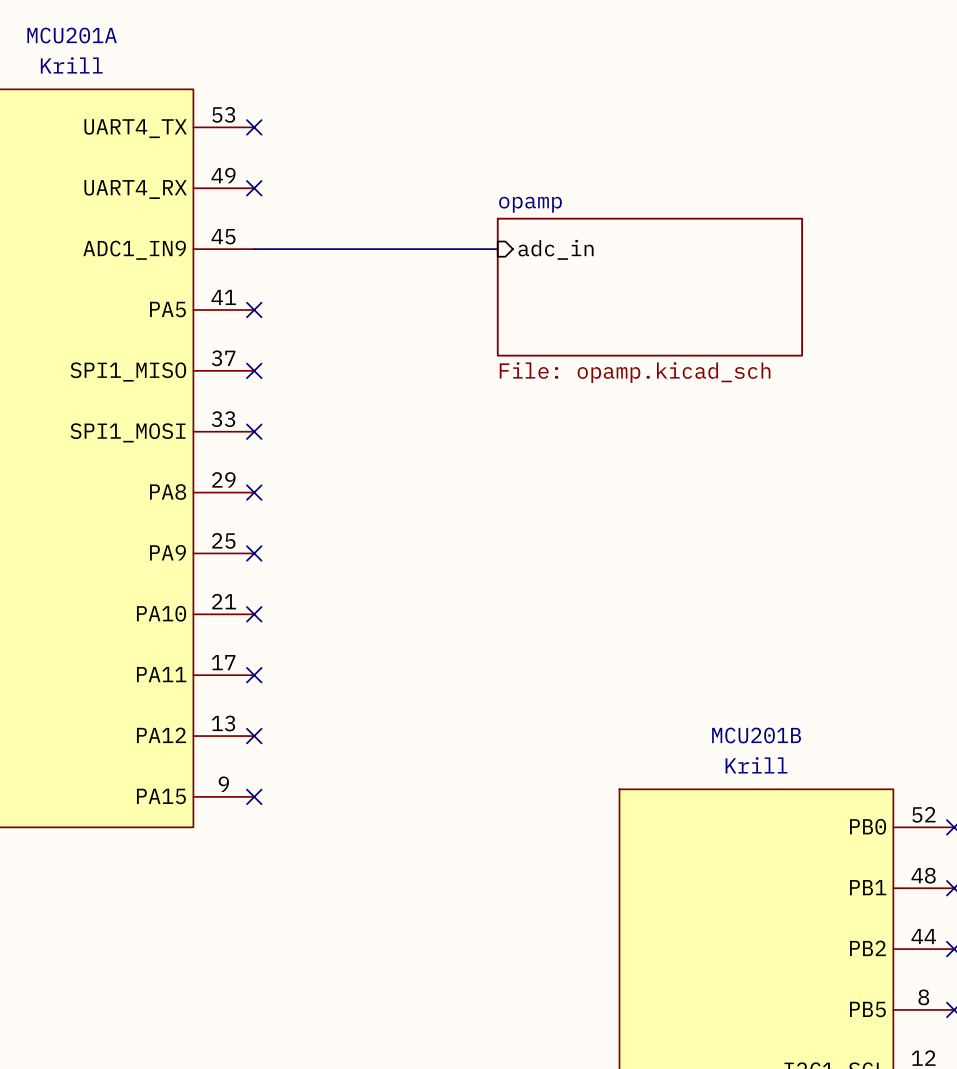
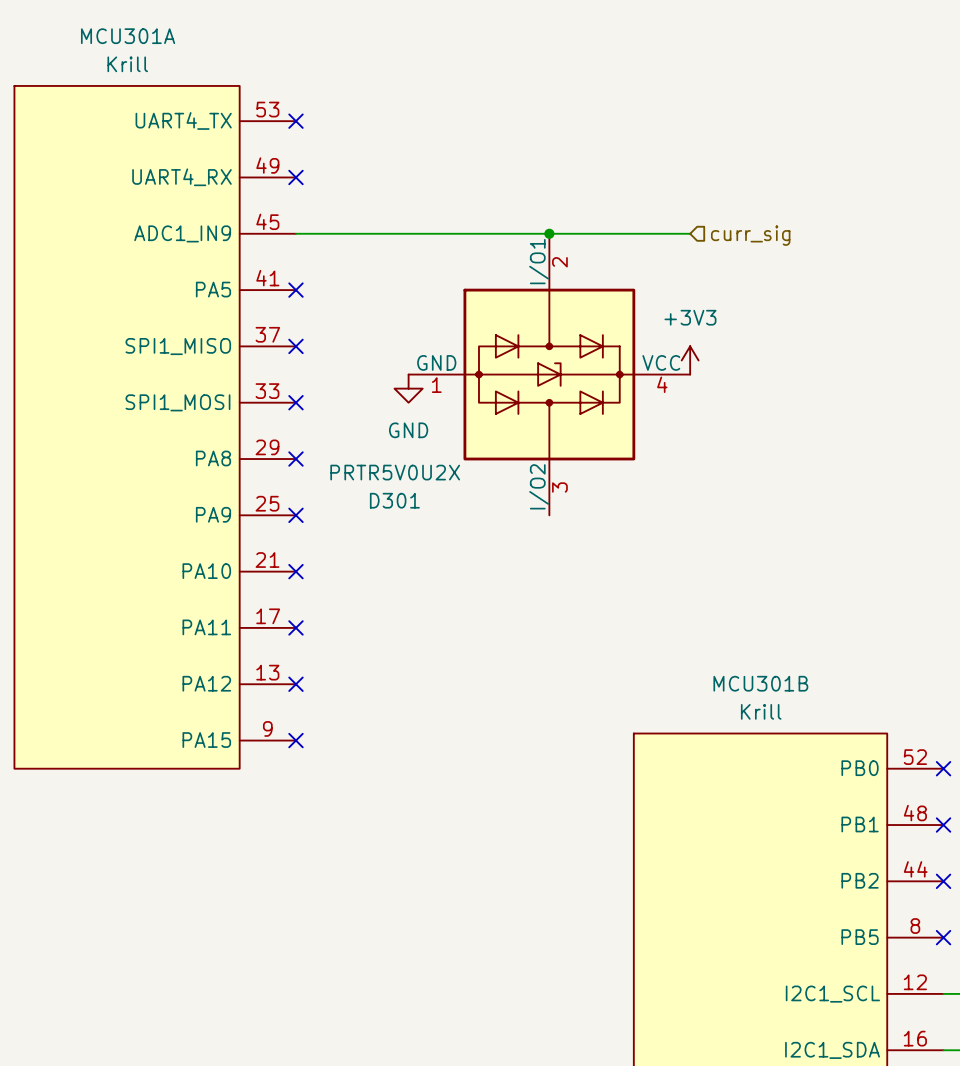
MCU201A name: MCU201A (72, 35) -> MCU301A (128, 36)
wire: none -> (521, 233) (690, 233)
junction: none -> (549, 233)
sheet pin: adc_in (556, 249) -> none
hierarchical label: none -> curr_sig (750, 235)
sheet opamp: File: opamp.kicad_sch (649, 287) -> none
power symbol: none -> +3V3 (690, 360)
D301: none -> PRTR5V0U2X (549, 374)
power symbol: none -> GND (408, 388)
MCU201B name: MCU201B (756, 735) -> MCU301B (760, 683)

